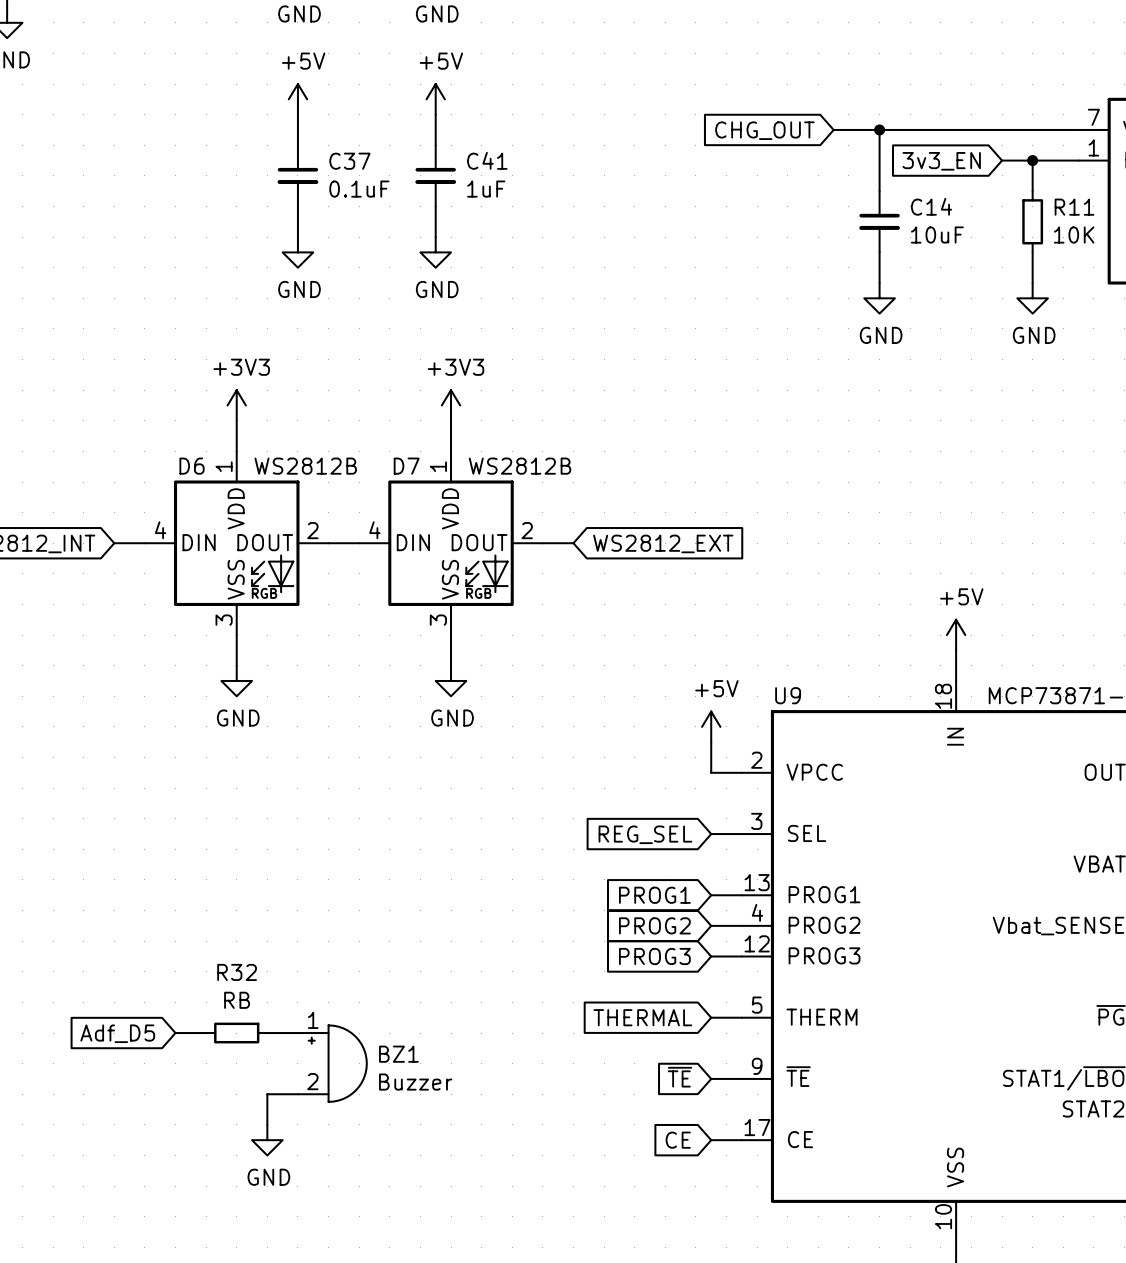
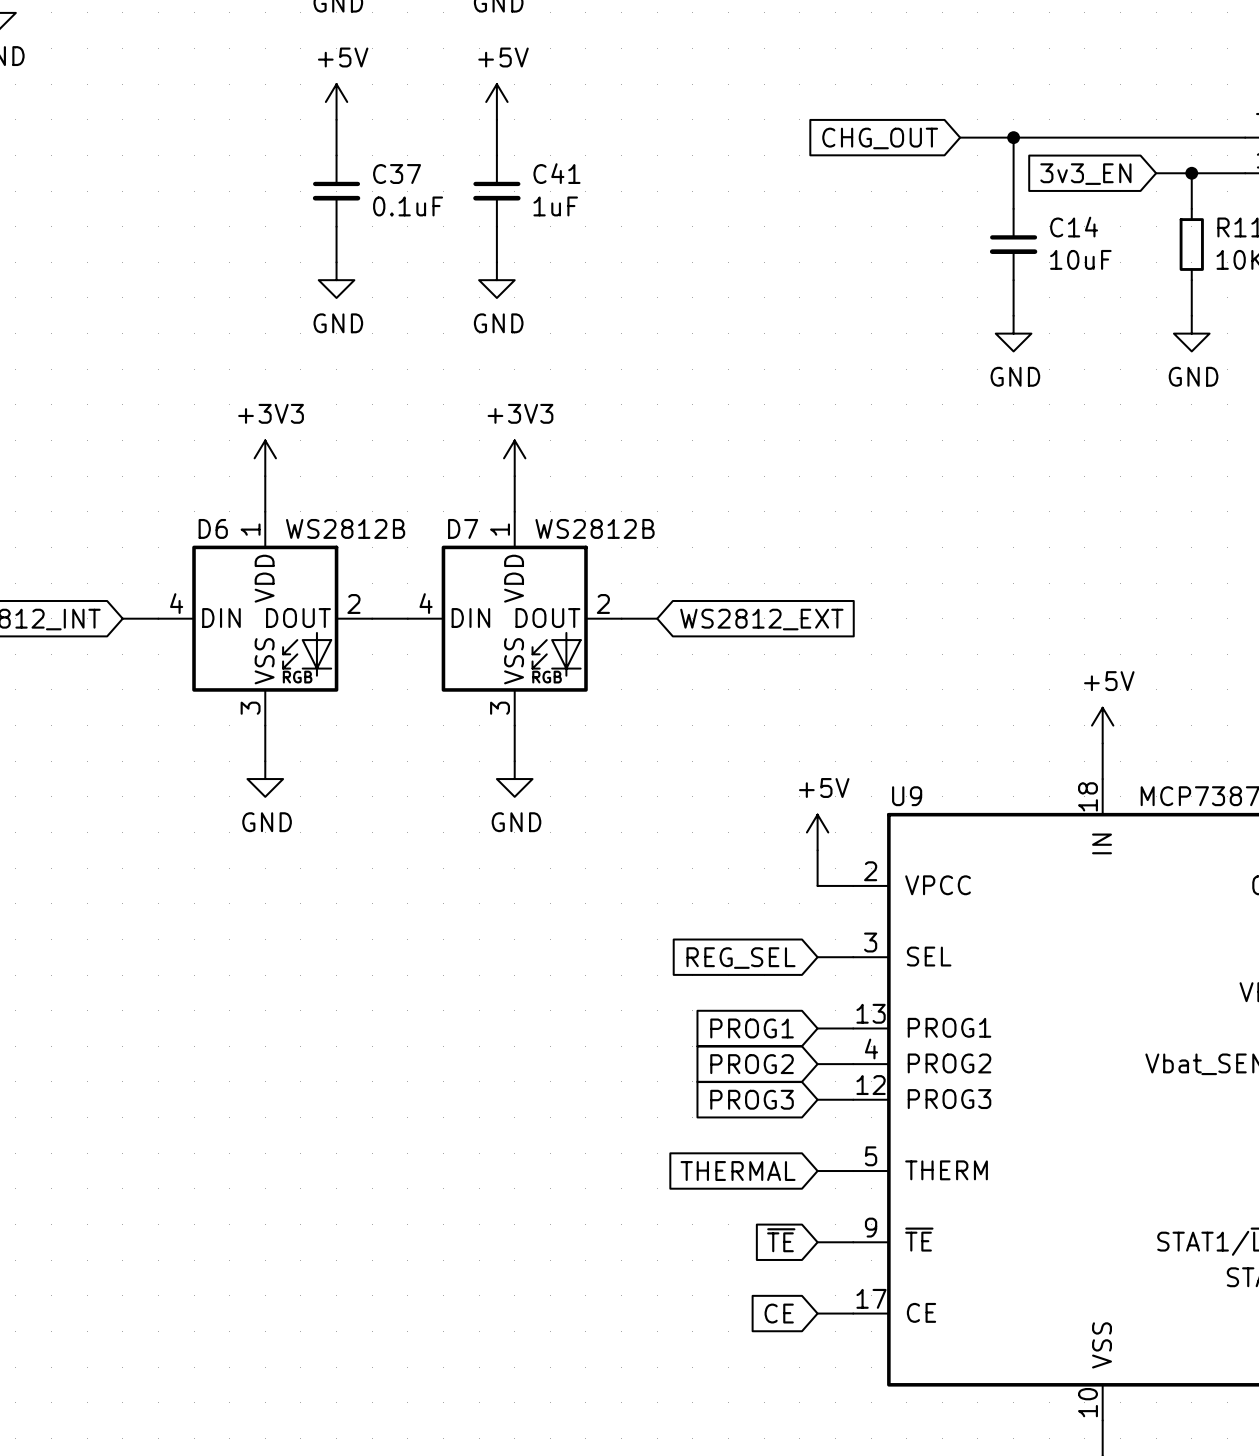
global label: Adf_D5 (117, 1033) -> none
wire: (175, 1033) (206, 1033) -> none
R32: RB (236, 1033) -> none
wire: (267, 1033) (297, 1033) -> none
BZ1: Buzzer (332, 1063) -> none
wire: (297, 1094) (267, 1094) (267, 1124) -> none
power symbol: GND (267, 1140) -> none

